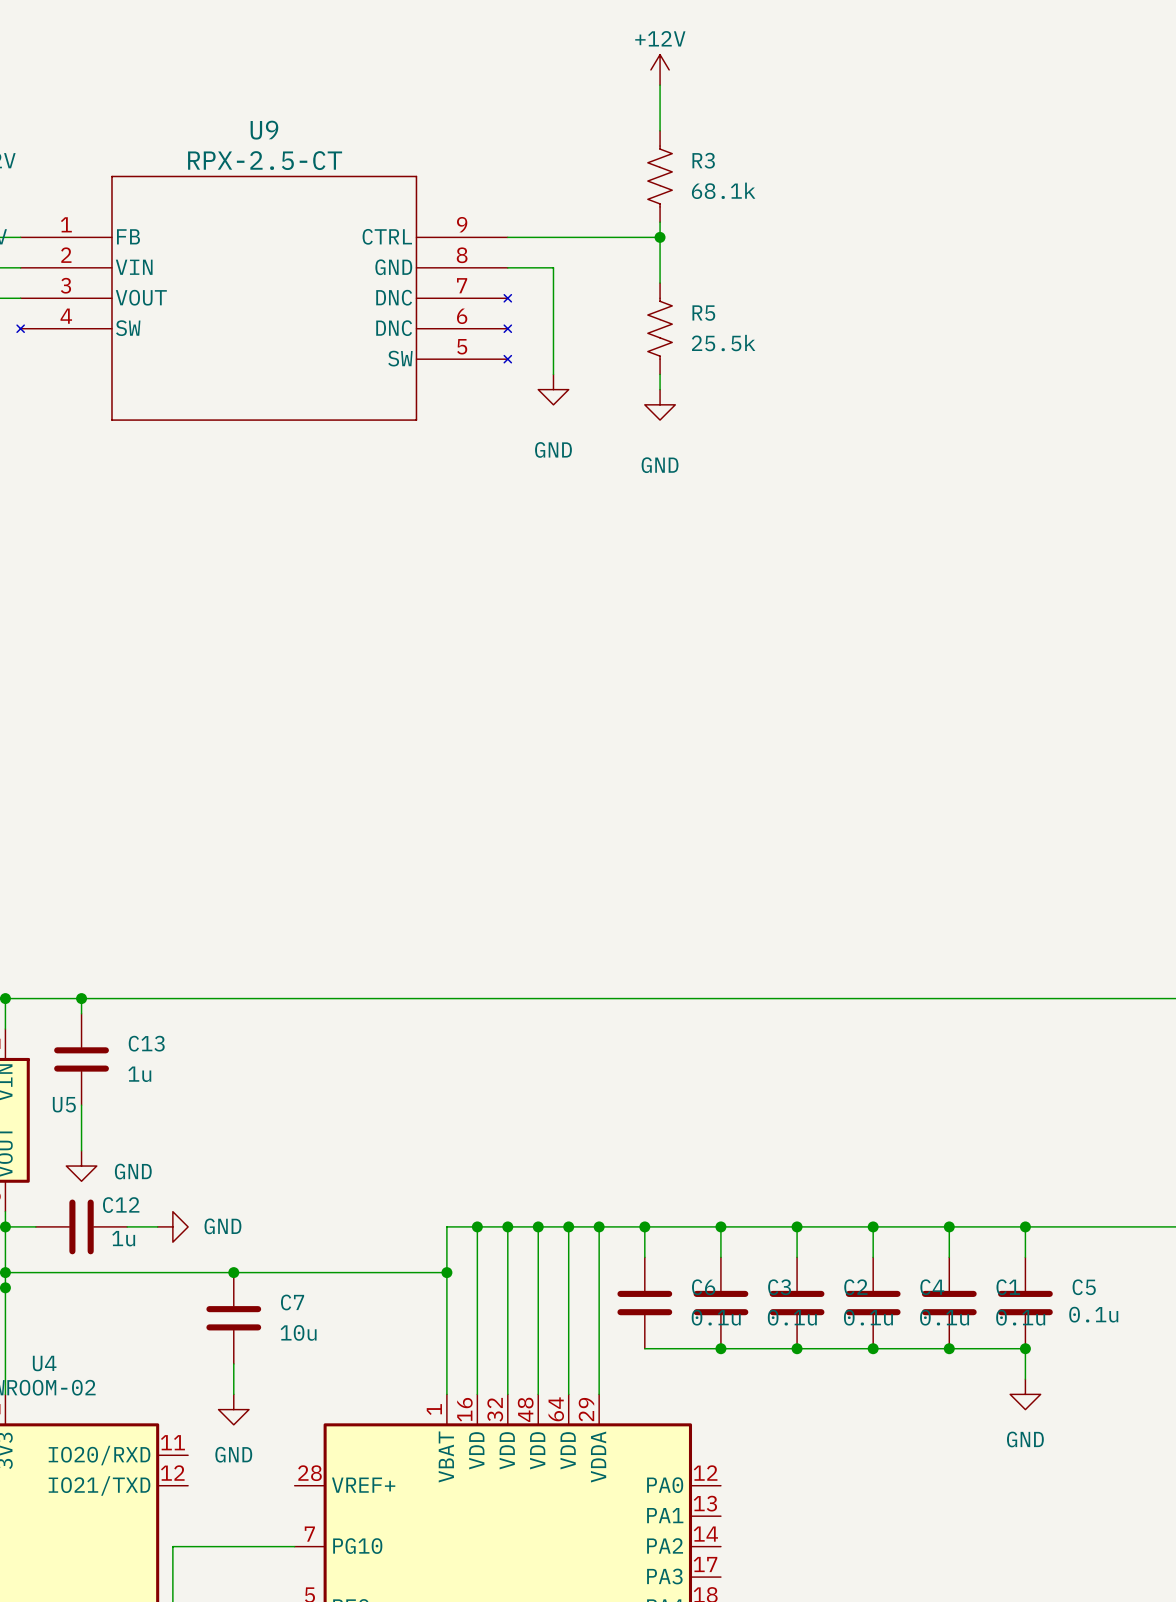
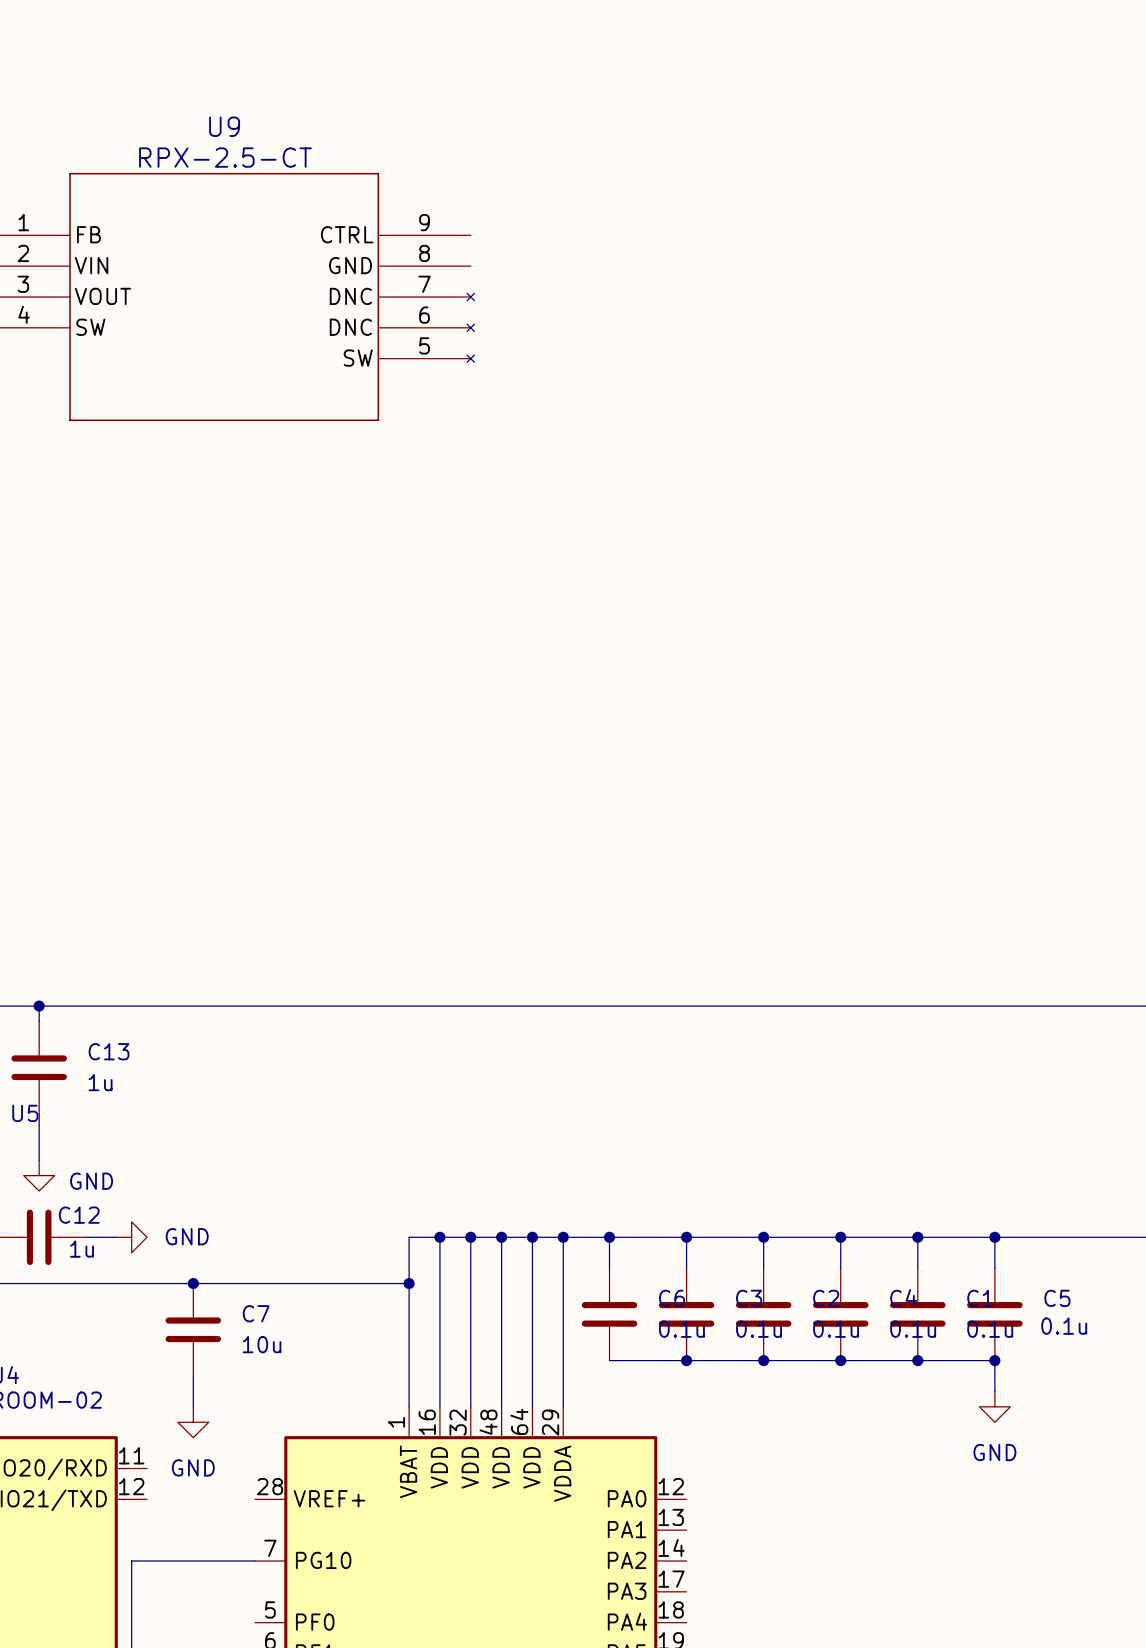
power symbol: +12V (660, 69) -> none
wire: (660, 85) (660, 130) -> none
R3: 68.1k (660, 176) -> none
wire: (660, 222) (660, 283) -> none
wire: (507, 237) (660, 237) -> none
junction: (660, 237) -> none
wire: (507, 267) (553, 267) (553, 374) -> none
R5: 25.5k (660, 328) -> none
wire: (660, 374) (660, 389) -> none
power symbol: GND (553, 389) -> none
power symbol: GND (660, 404) -> none

